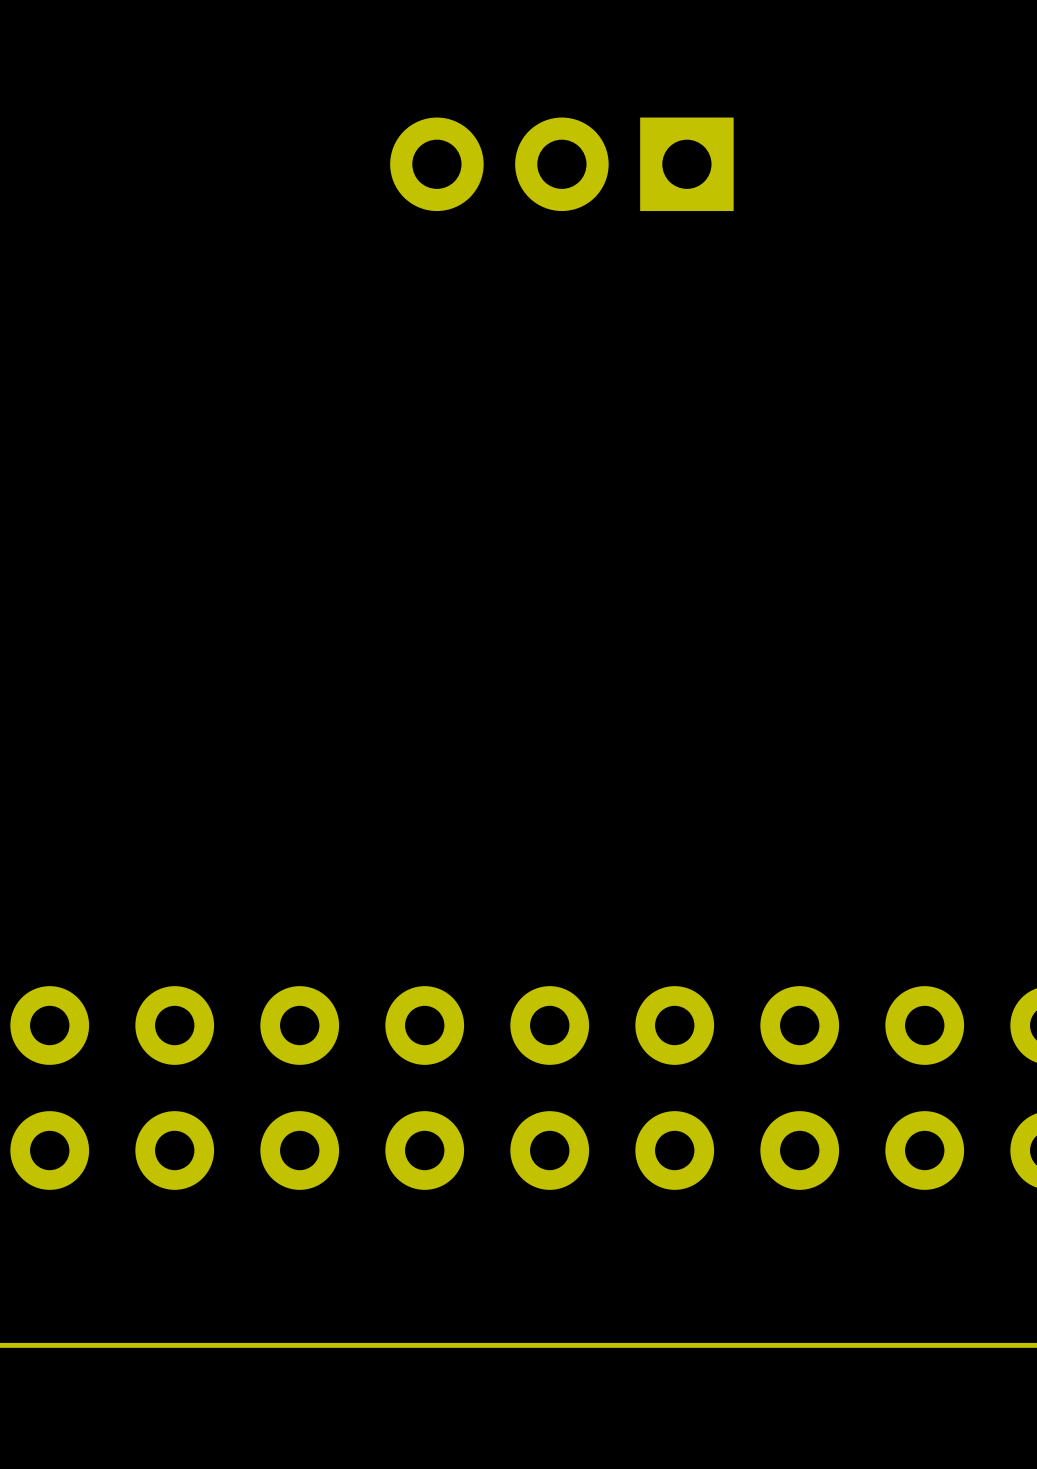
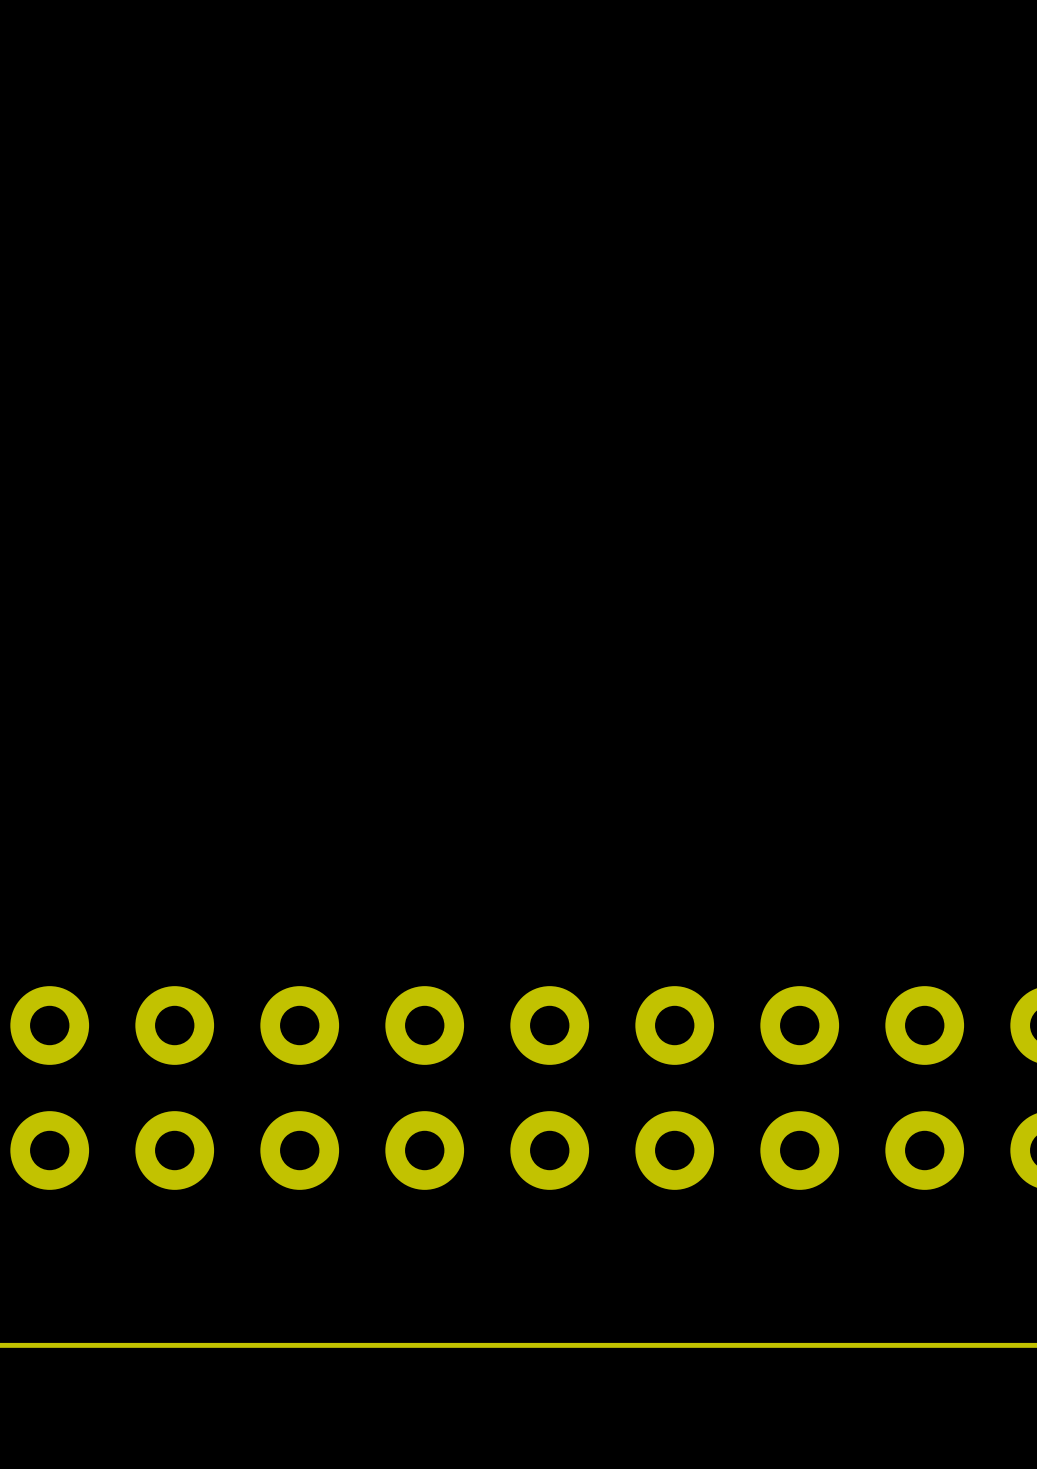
part: (561, 164) -> none

